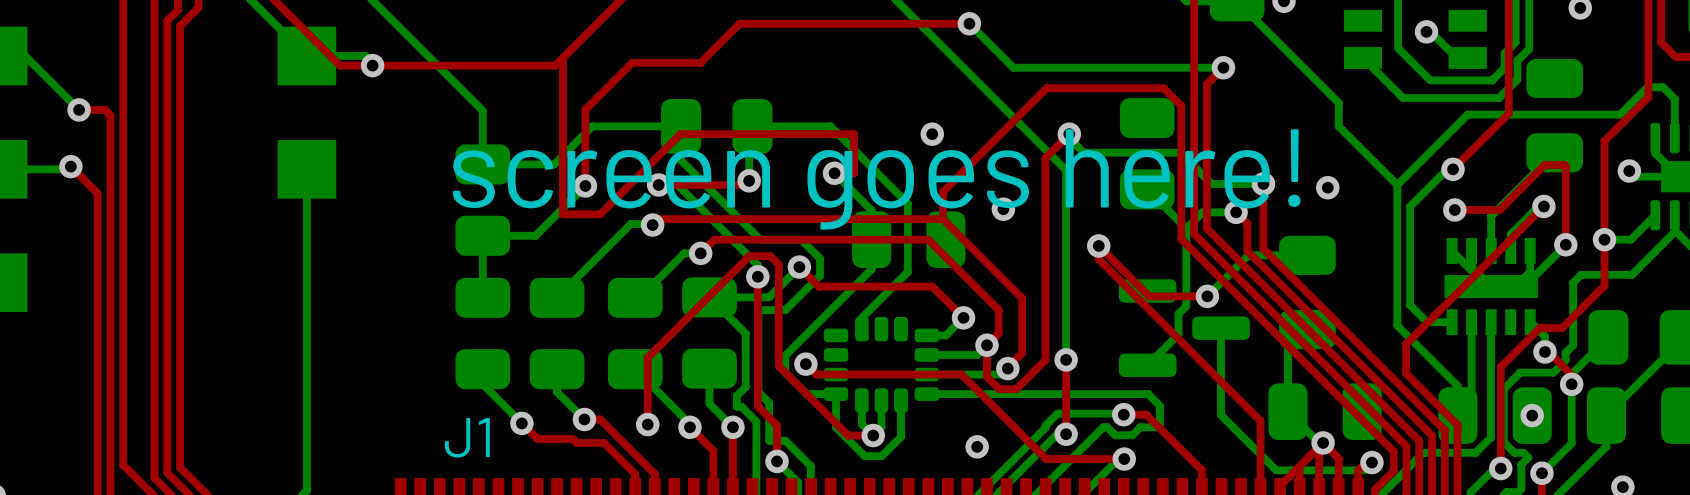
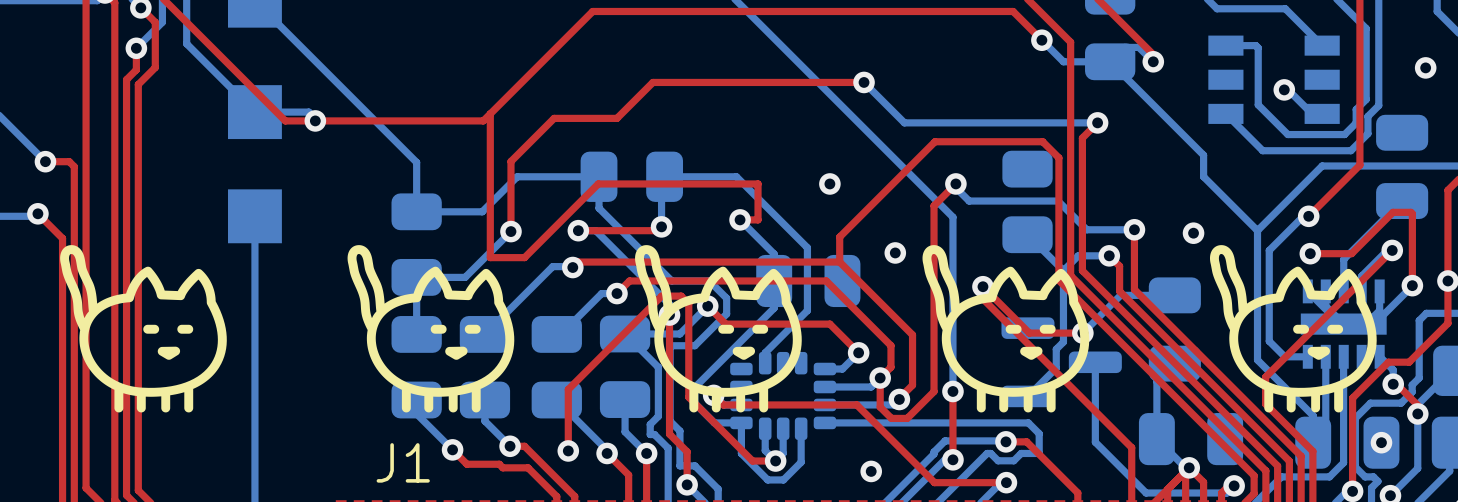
text: screen goes here! (876, 179) -> none
drawing: none -> [60, 245, 227, 413]
drawing: none -> [347, 245, 515, 413]
drawing: none -> [635, 245, 802, 413]
drawing: none -> [922, 245, 1090, 413]
drawing: none -> [1209, 245, 1377, 413]

